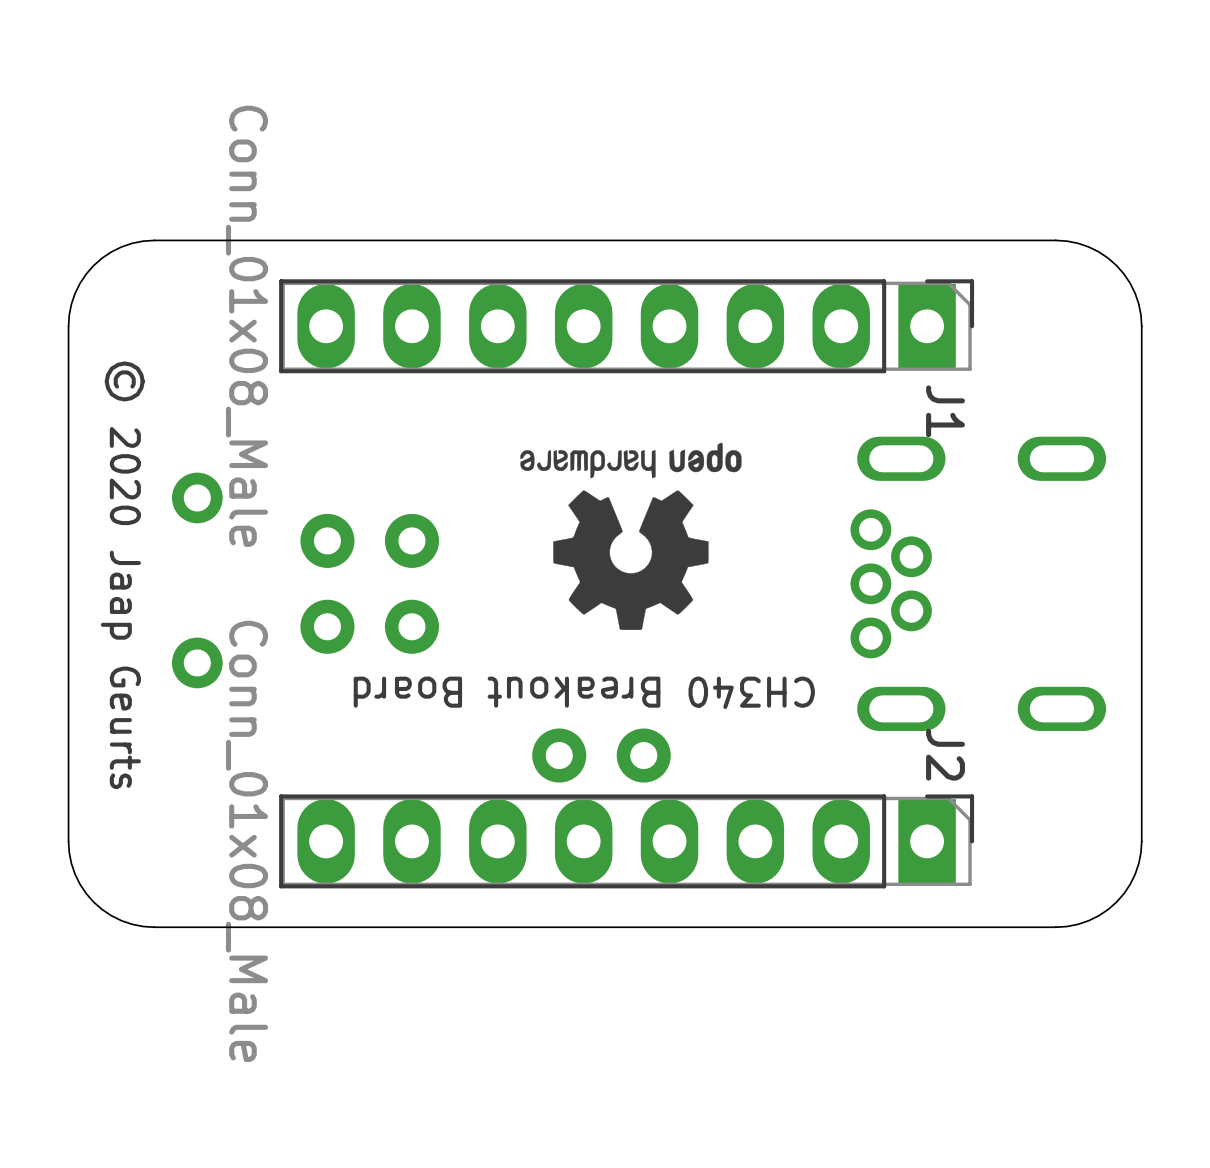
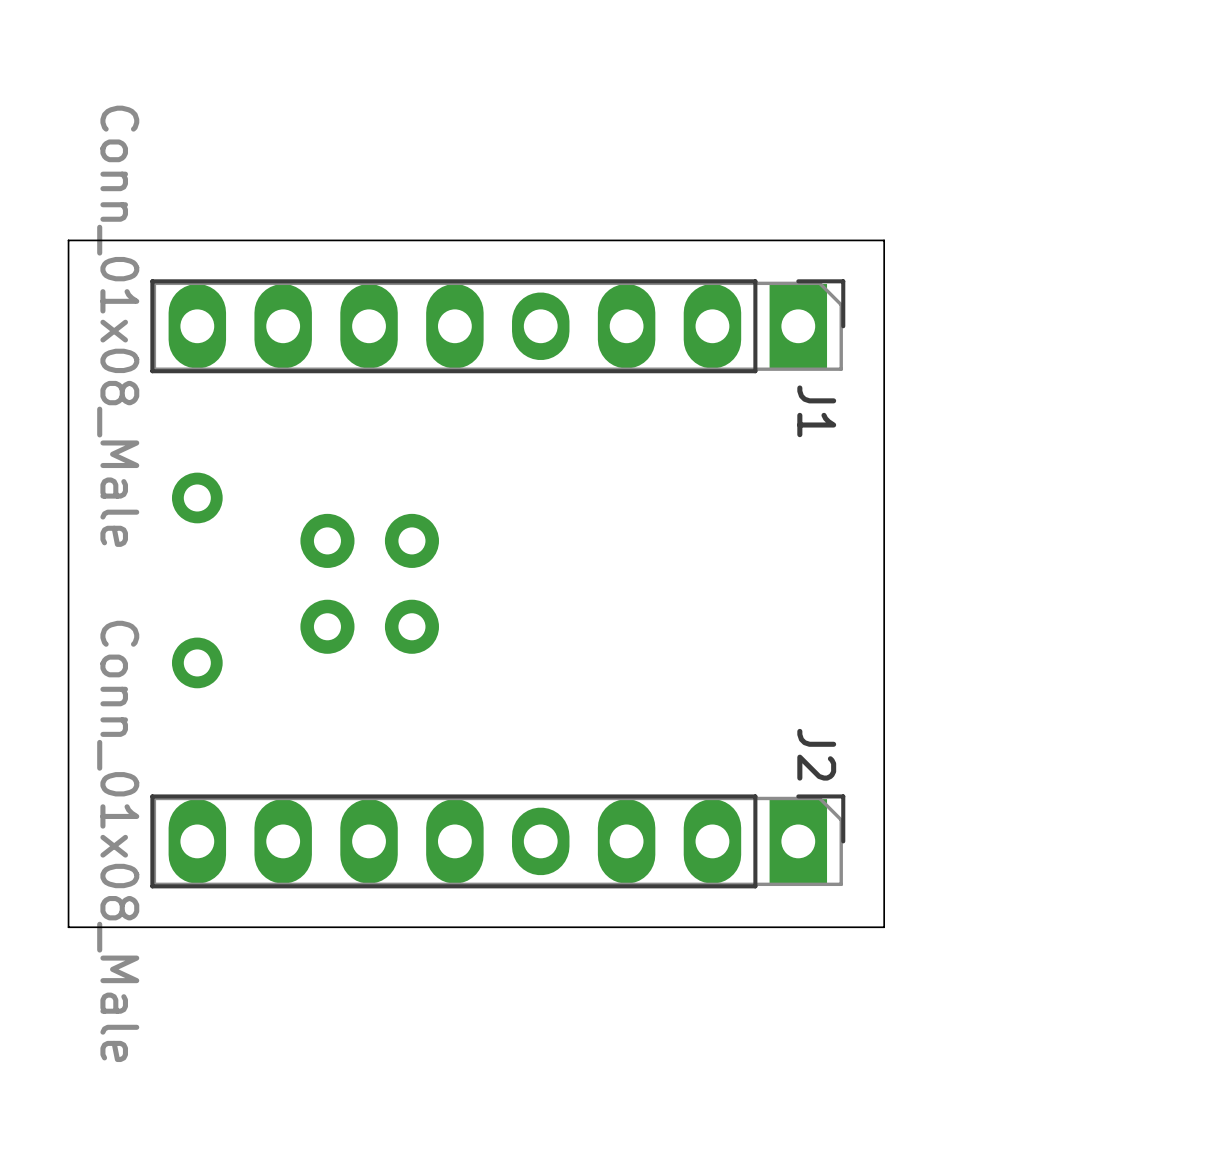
board edge: (154, 240) (121, 246) (93, 265) (75, 293) (68, 326) -> (154, 240) (68, 240) (68, 326)
board edge: (884, 240) (1055, 240) (1078, 243) (1108, 258) (1123, 274) (1138, 304) (1141, 326) (1141, 841) (1135, 874) (1116, 902) (1098, 915) (1078, 924) (1055, 927) (884, 927) -> (884, 240) (884, 927)
J1 footprint: [279, 279, 975, 374] -> [150, 279, 846, 374]
drawing: [520, 442, 742, 631] -> none
text: © 2020 Jaap Geurts (122, 575) -> none
part: (978, 583) -> none
text: CH340 Breakout Board (584, 692) -> none
part: (601, 755) -> none
J2 footprint: [279, 794, 975, 889] -> [150, 794, 846, 889]
board edge: (68, 841) (75, 874) (93, 902) (121, 920) (154, 927) -> (68, 841) (68, 927) (154, 927)

